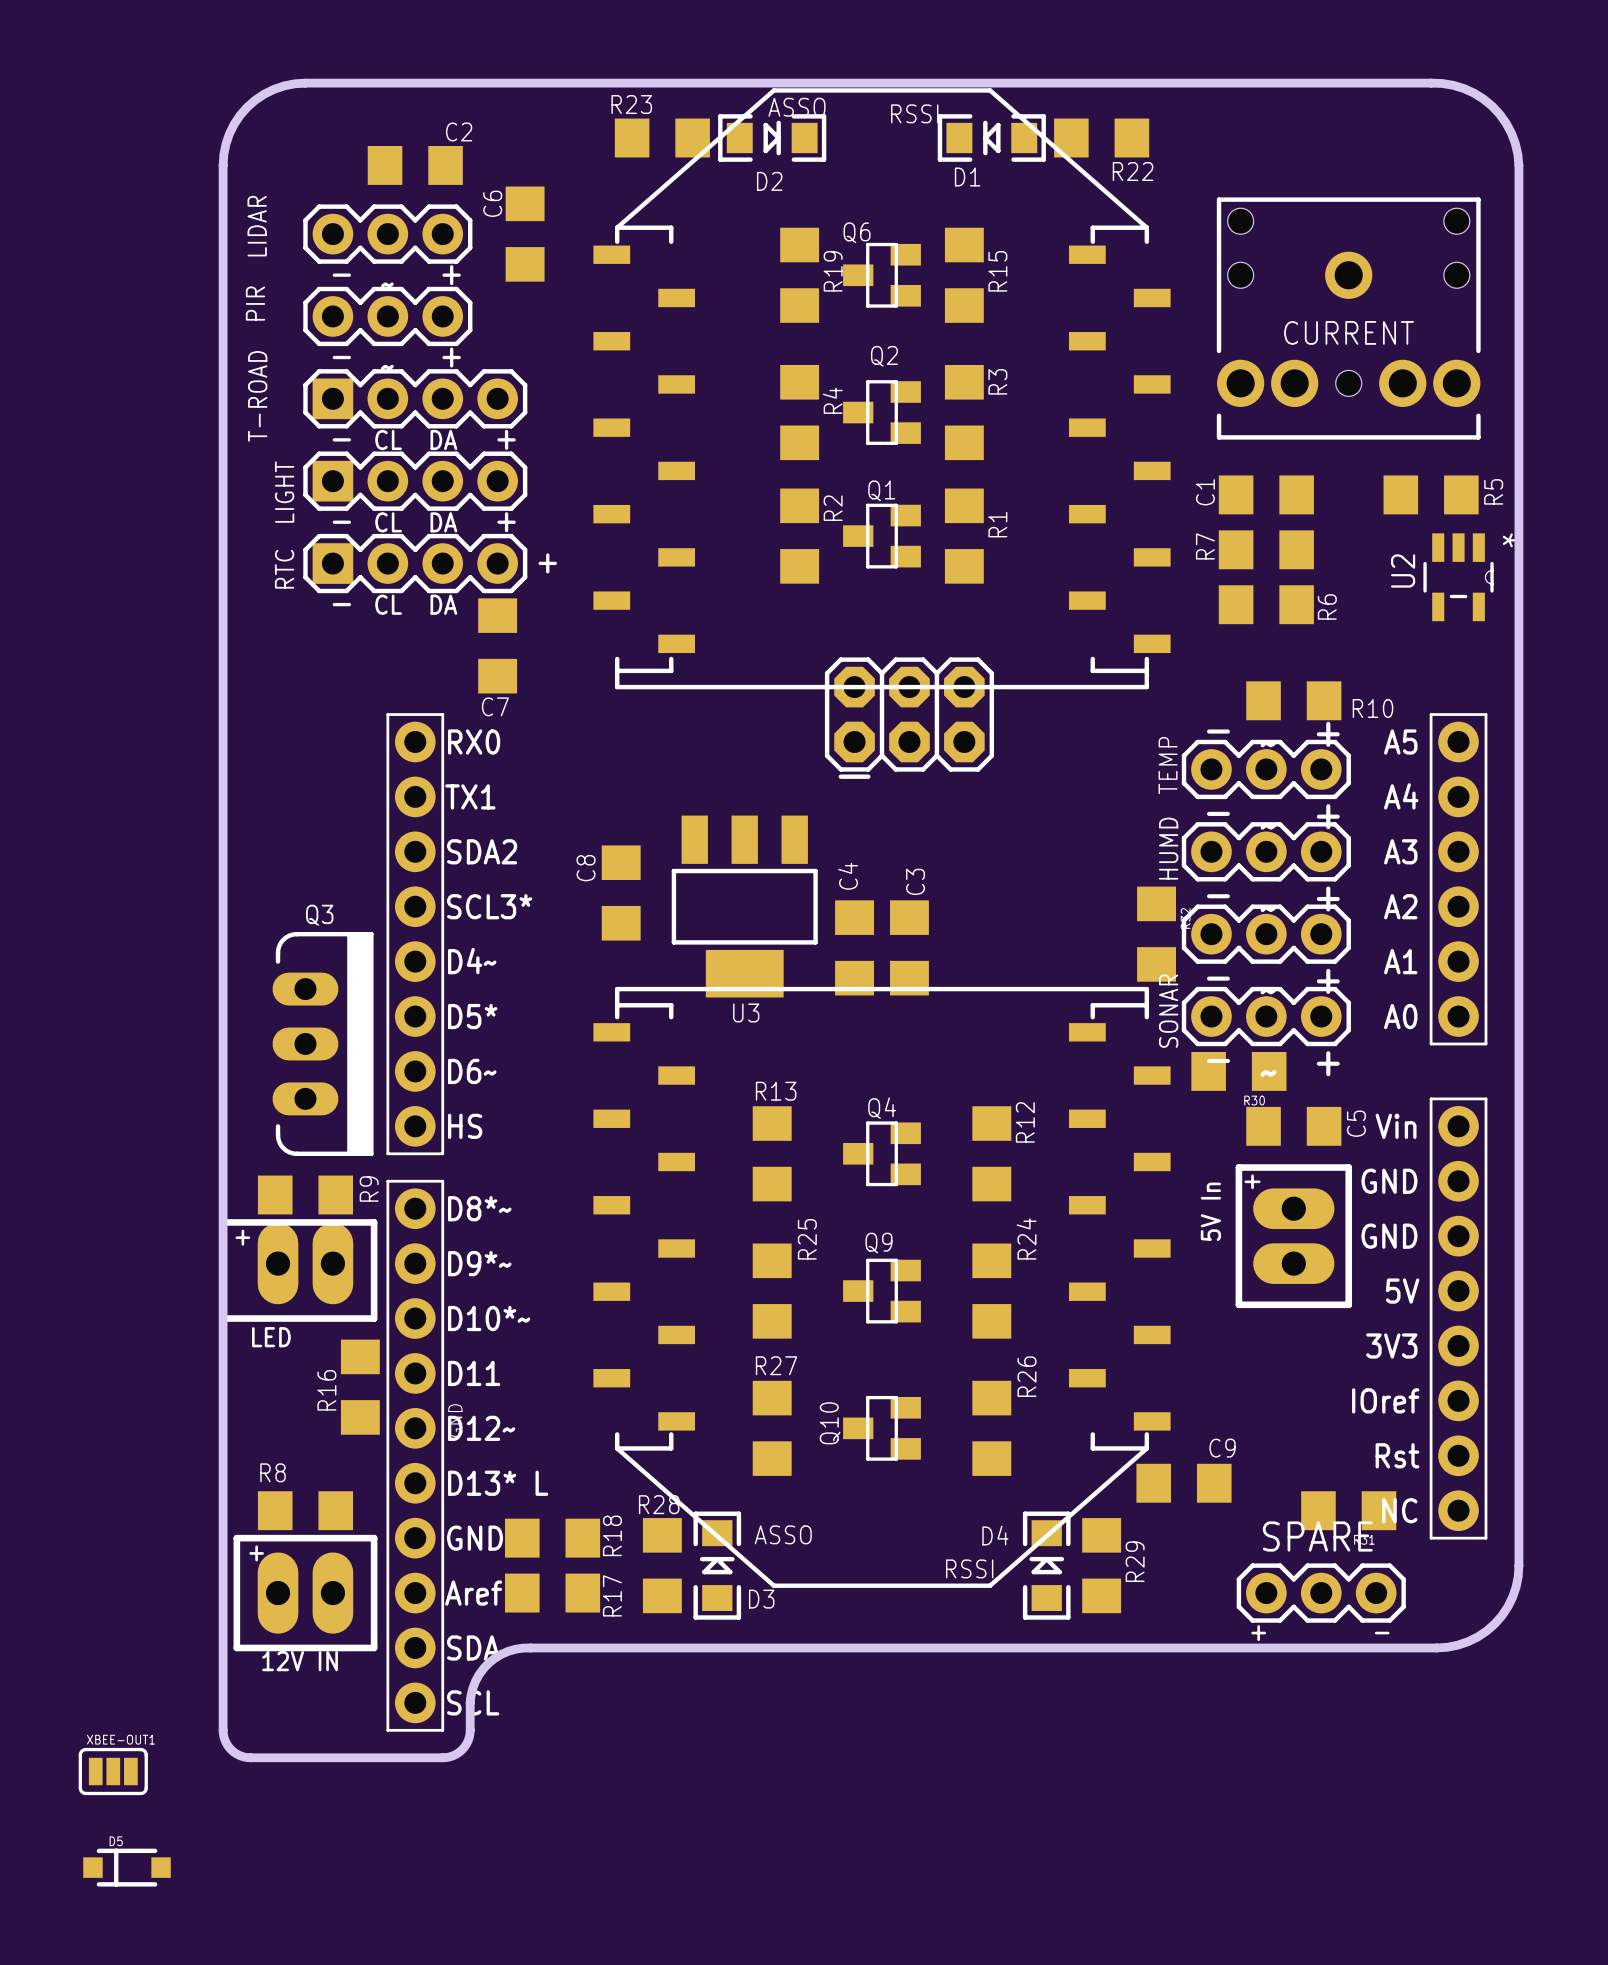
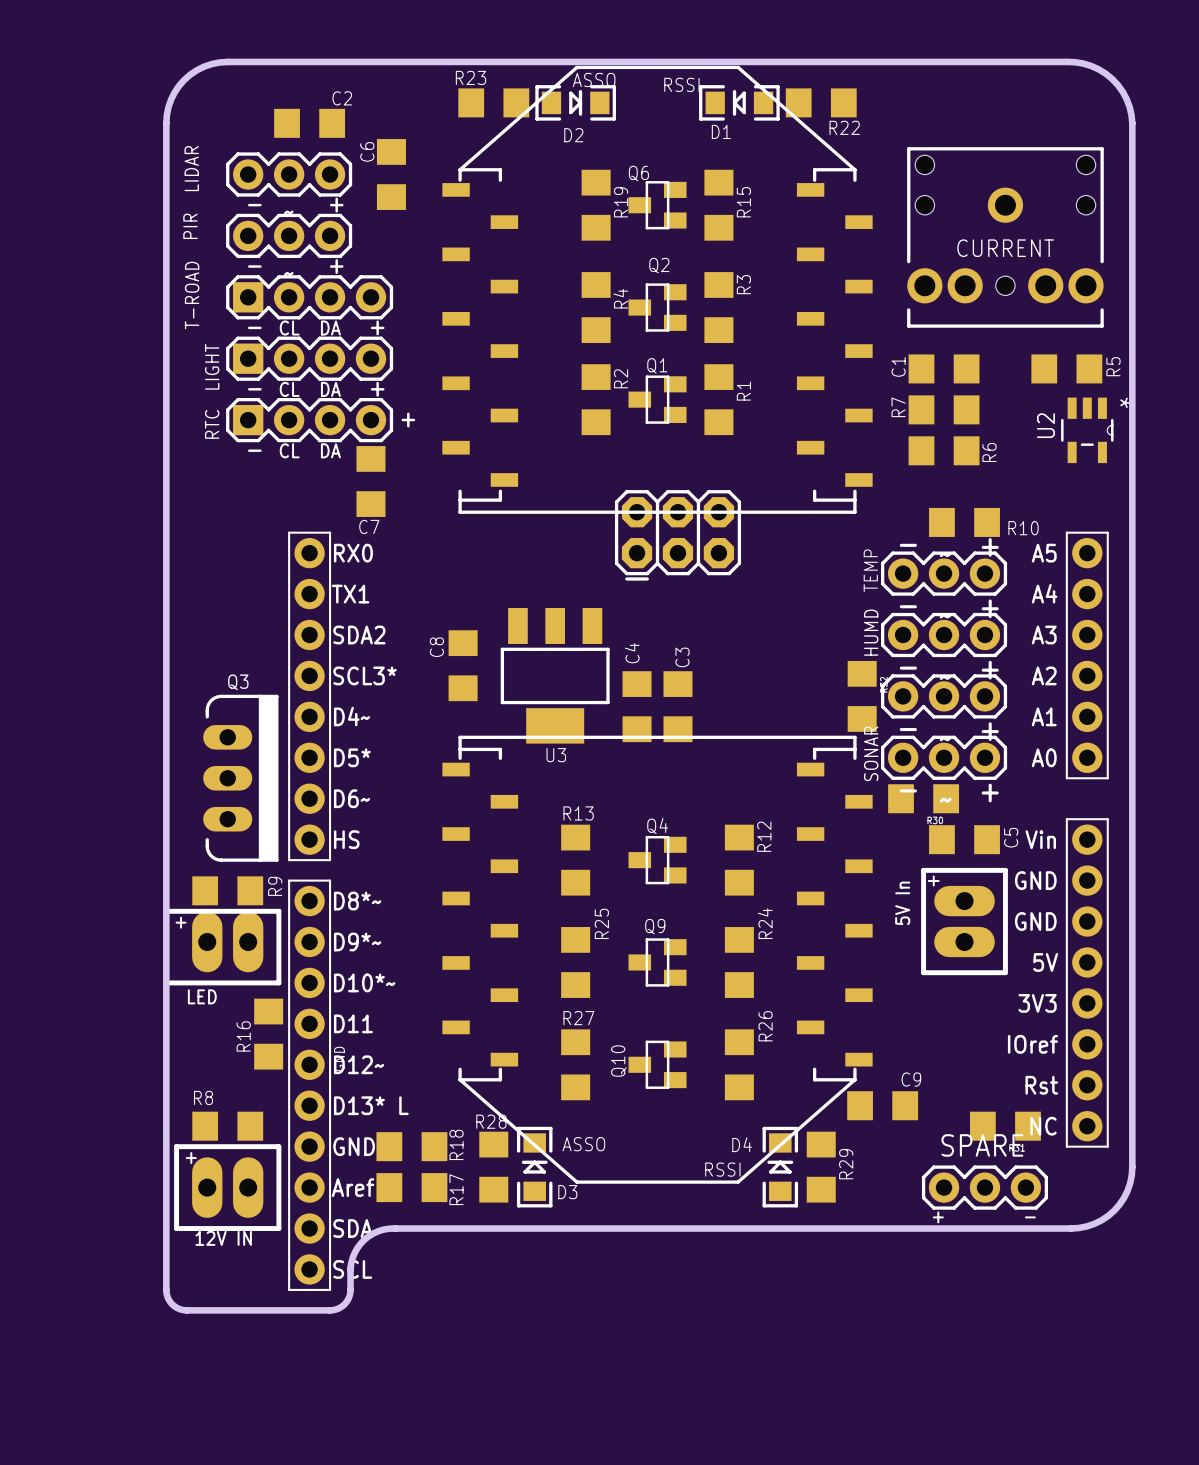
XBEE-OUT1: (113, 1771) -> none
D5: (127, 1867) -> none

